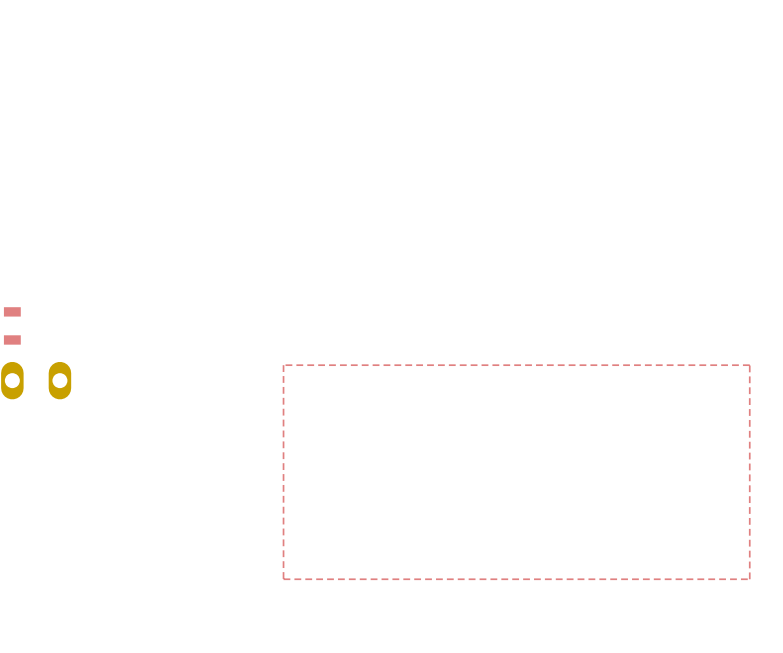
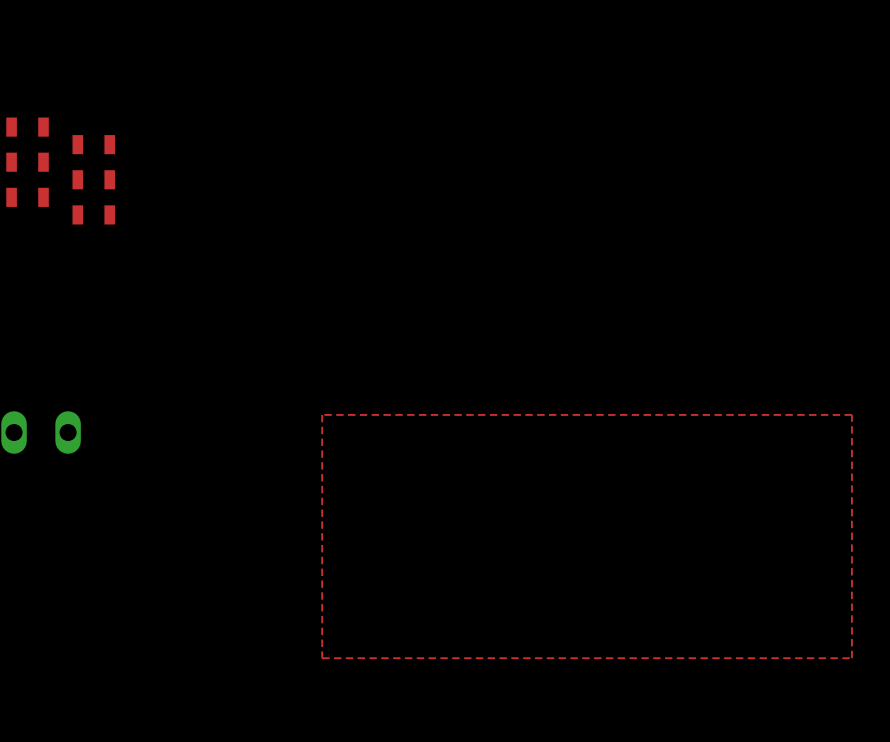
part: none -> (27, 127)
part: none -> (93, 144)
part: none -> (27, 162)
part: none -> (93, 179)
part: none -> (27, 197)
part: none -> (93, 214)
part: (12, 325) -> none

